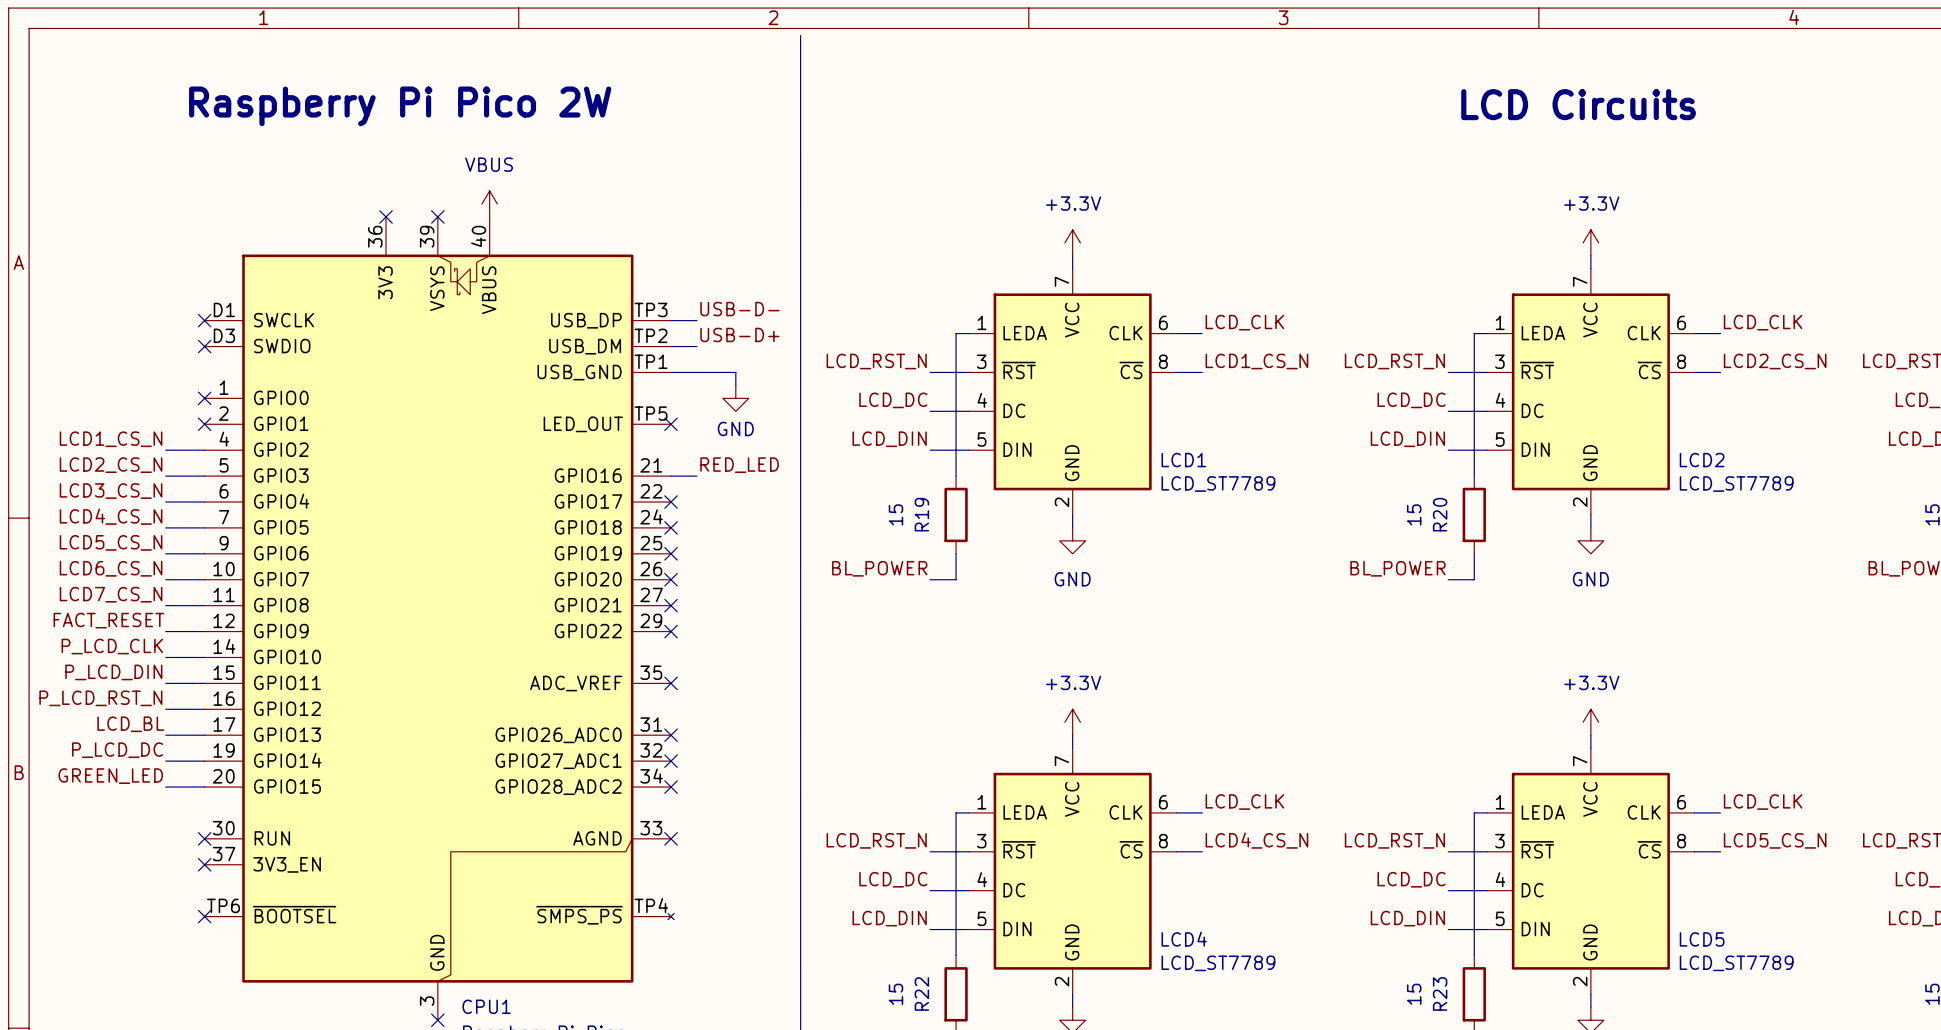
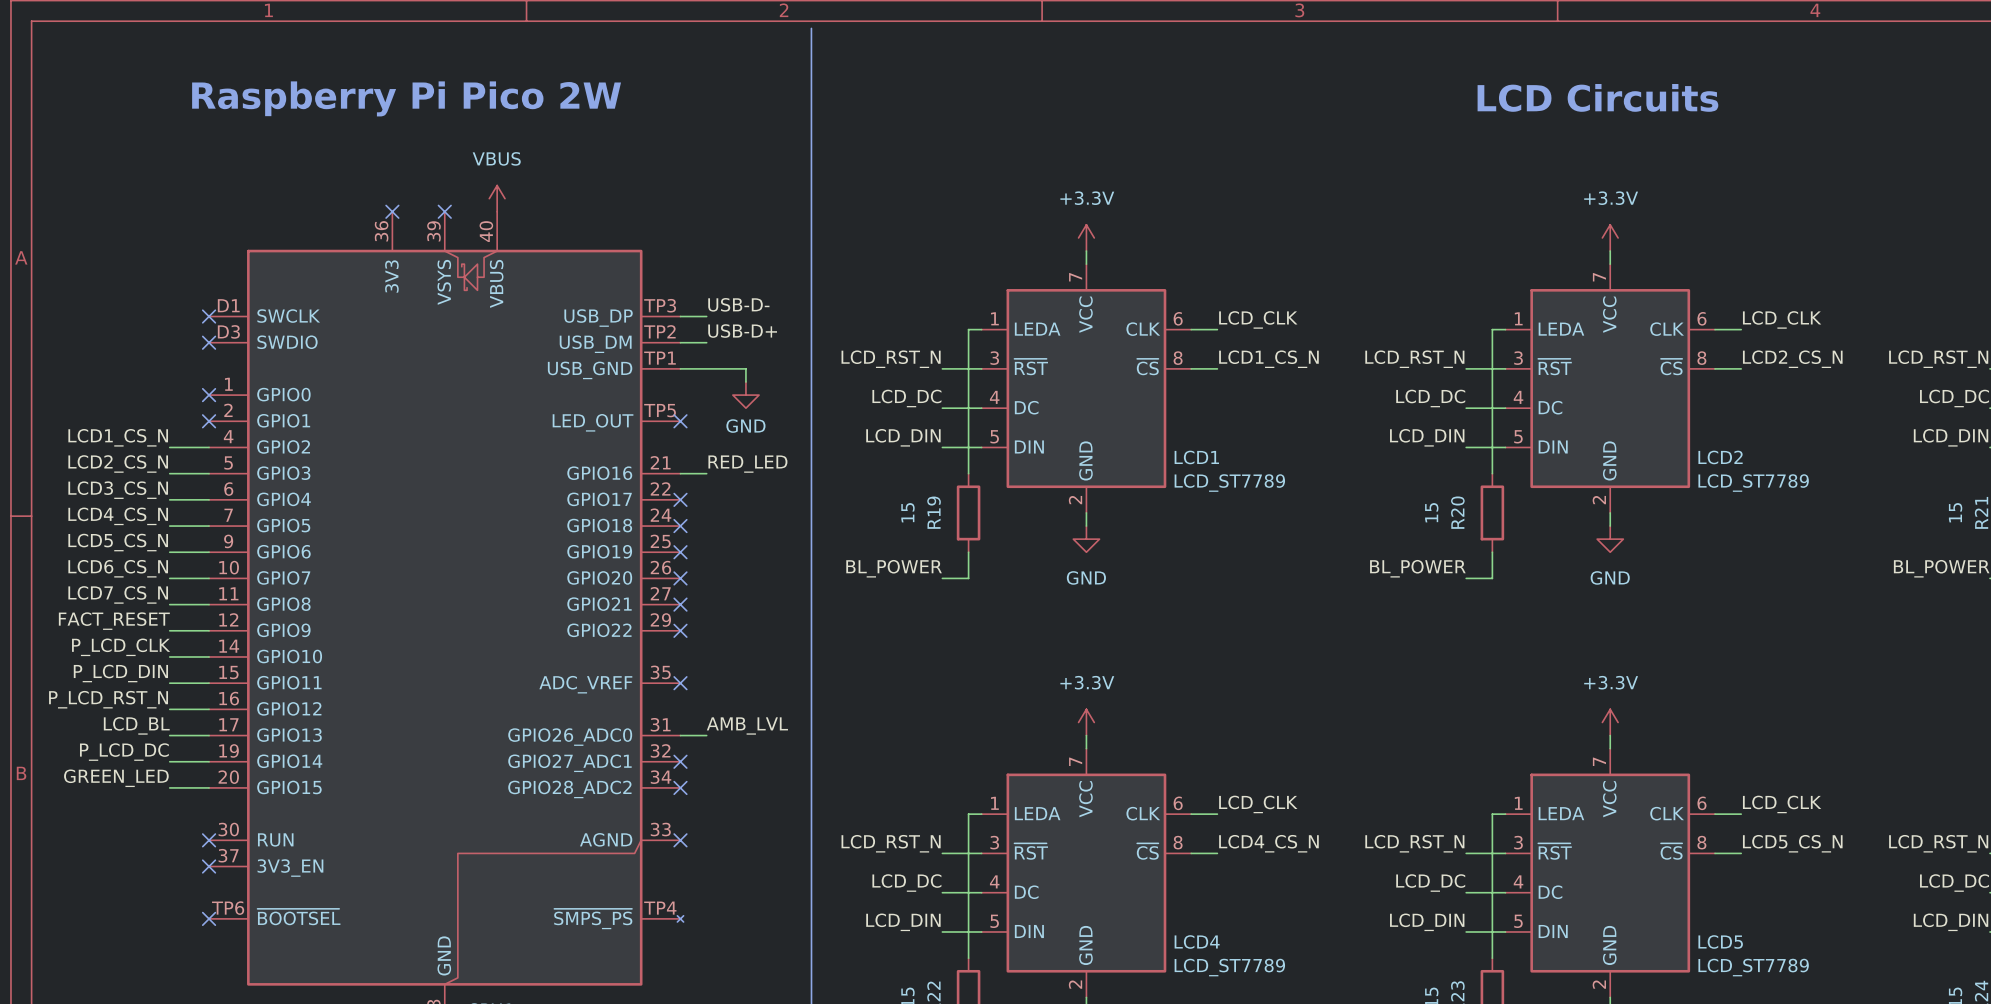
label: none -> AMB_LVL (747, 725)
wire: none -> (680, 735) (706, 735)
no-connect mark: (671, 735) -> none

